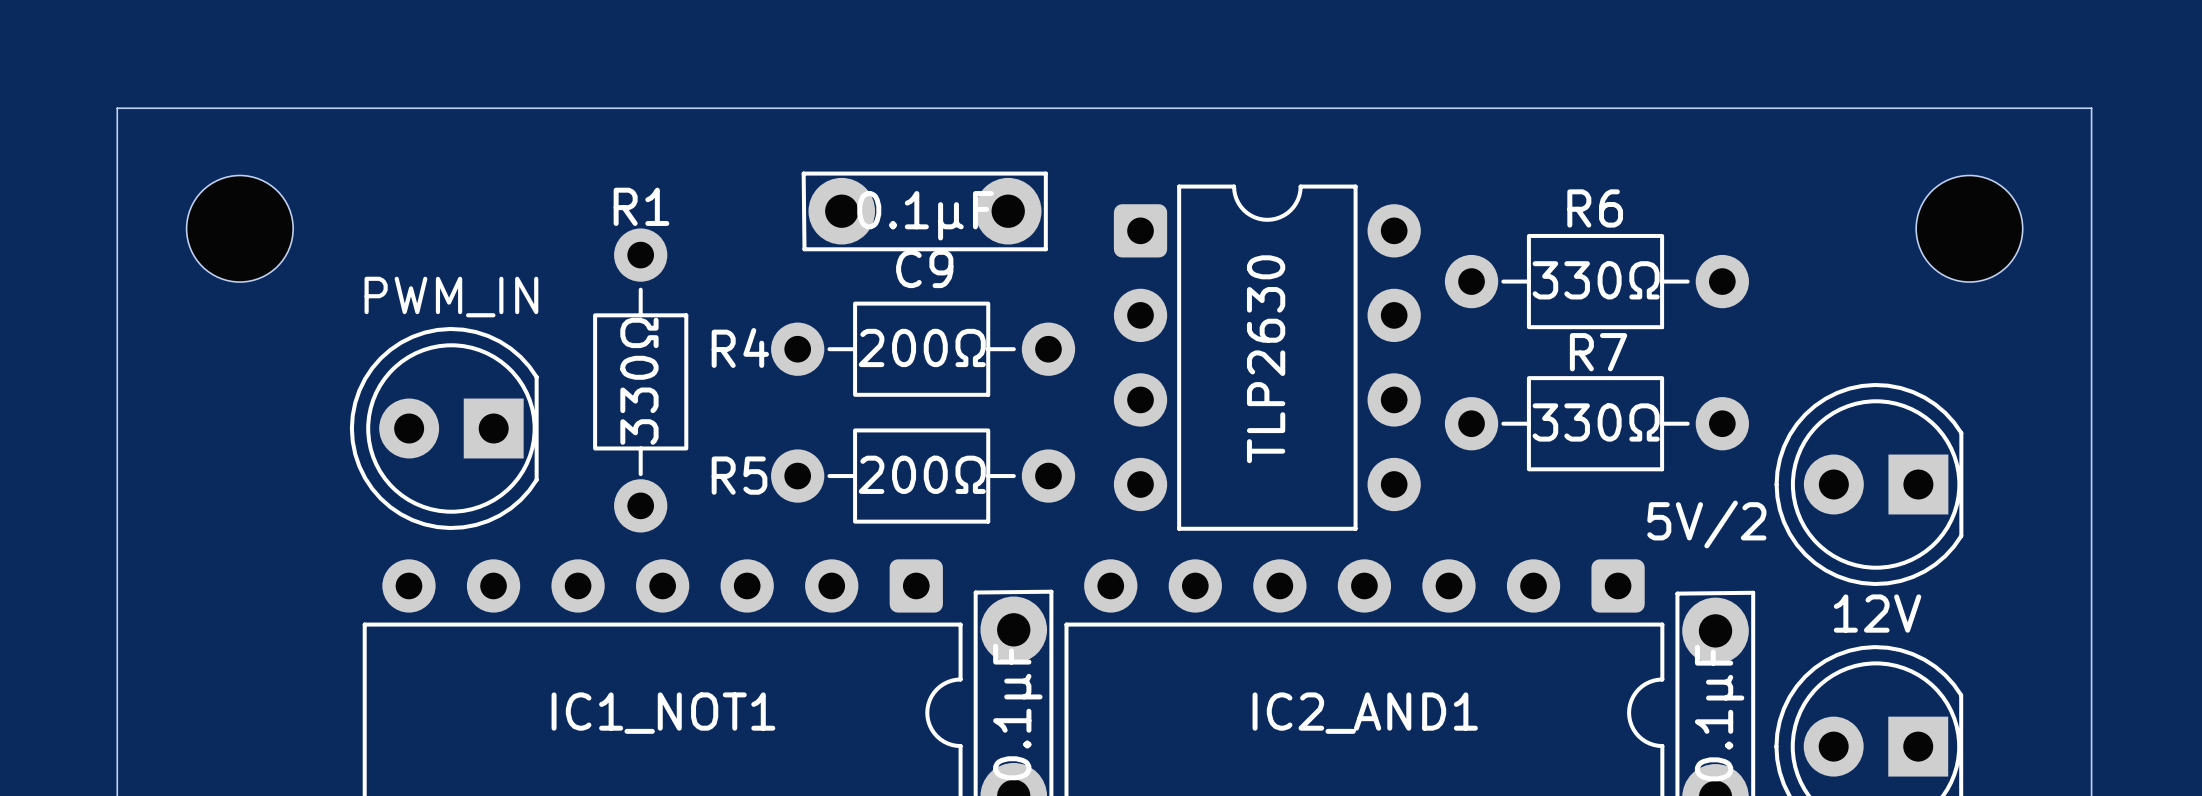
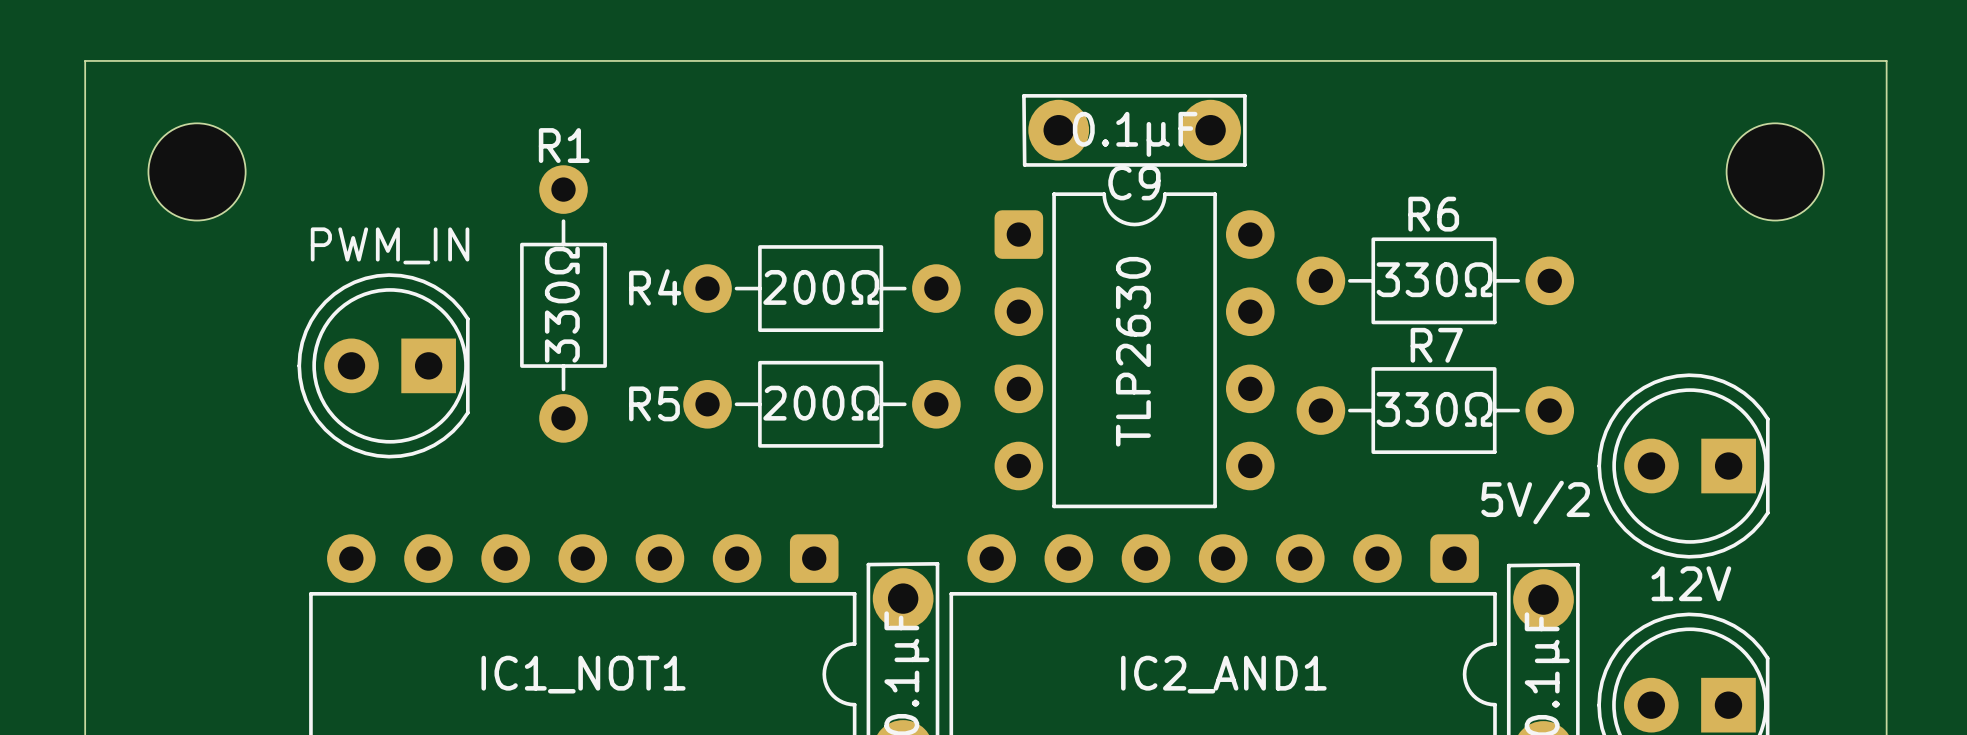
board edge: (117, 108) (2091, 108) -> (85, 122) (85, 60) (1886, 60) (1886, 122)
C9 position: (924, 211) -> (1134, 130)
part position: (239, 228) -> (197, 171)
part position: (1969, 228) -> (1775, 171)
R4 position: (923, 349) -> (821, 288)
R1 position: (640, 380) -> (563, 303)
part position: (444, 428) -> (383, 365)
R5 position: (923, 476) -> (821, 404)

